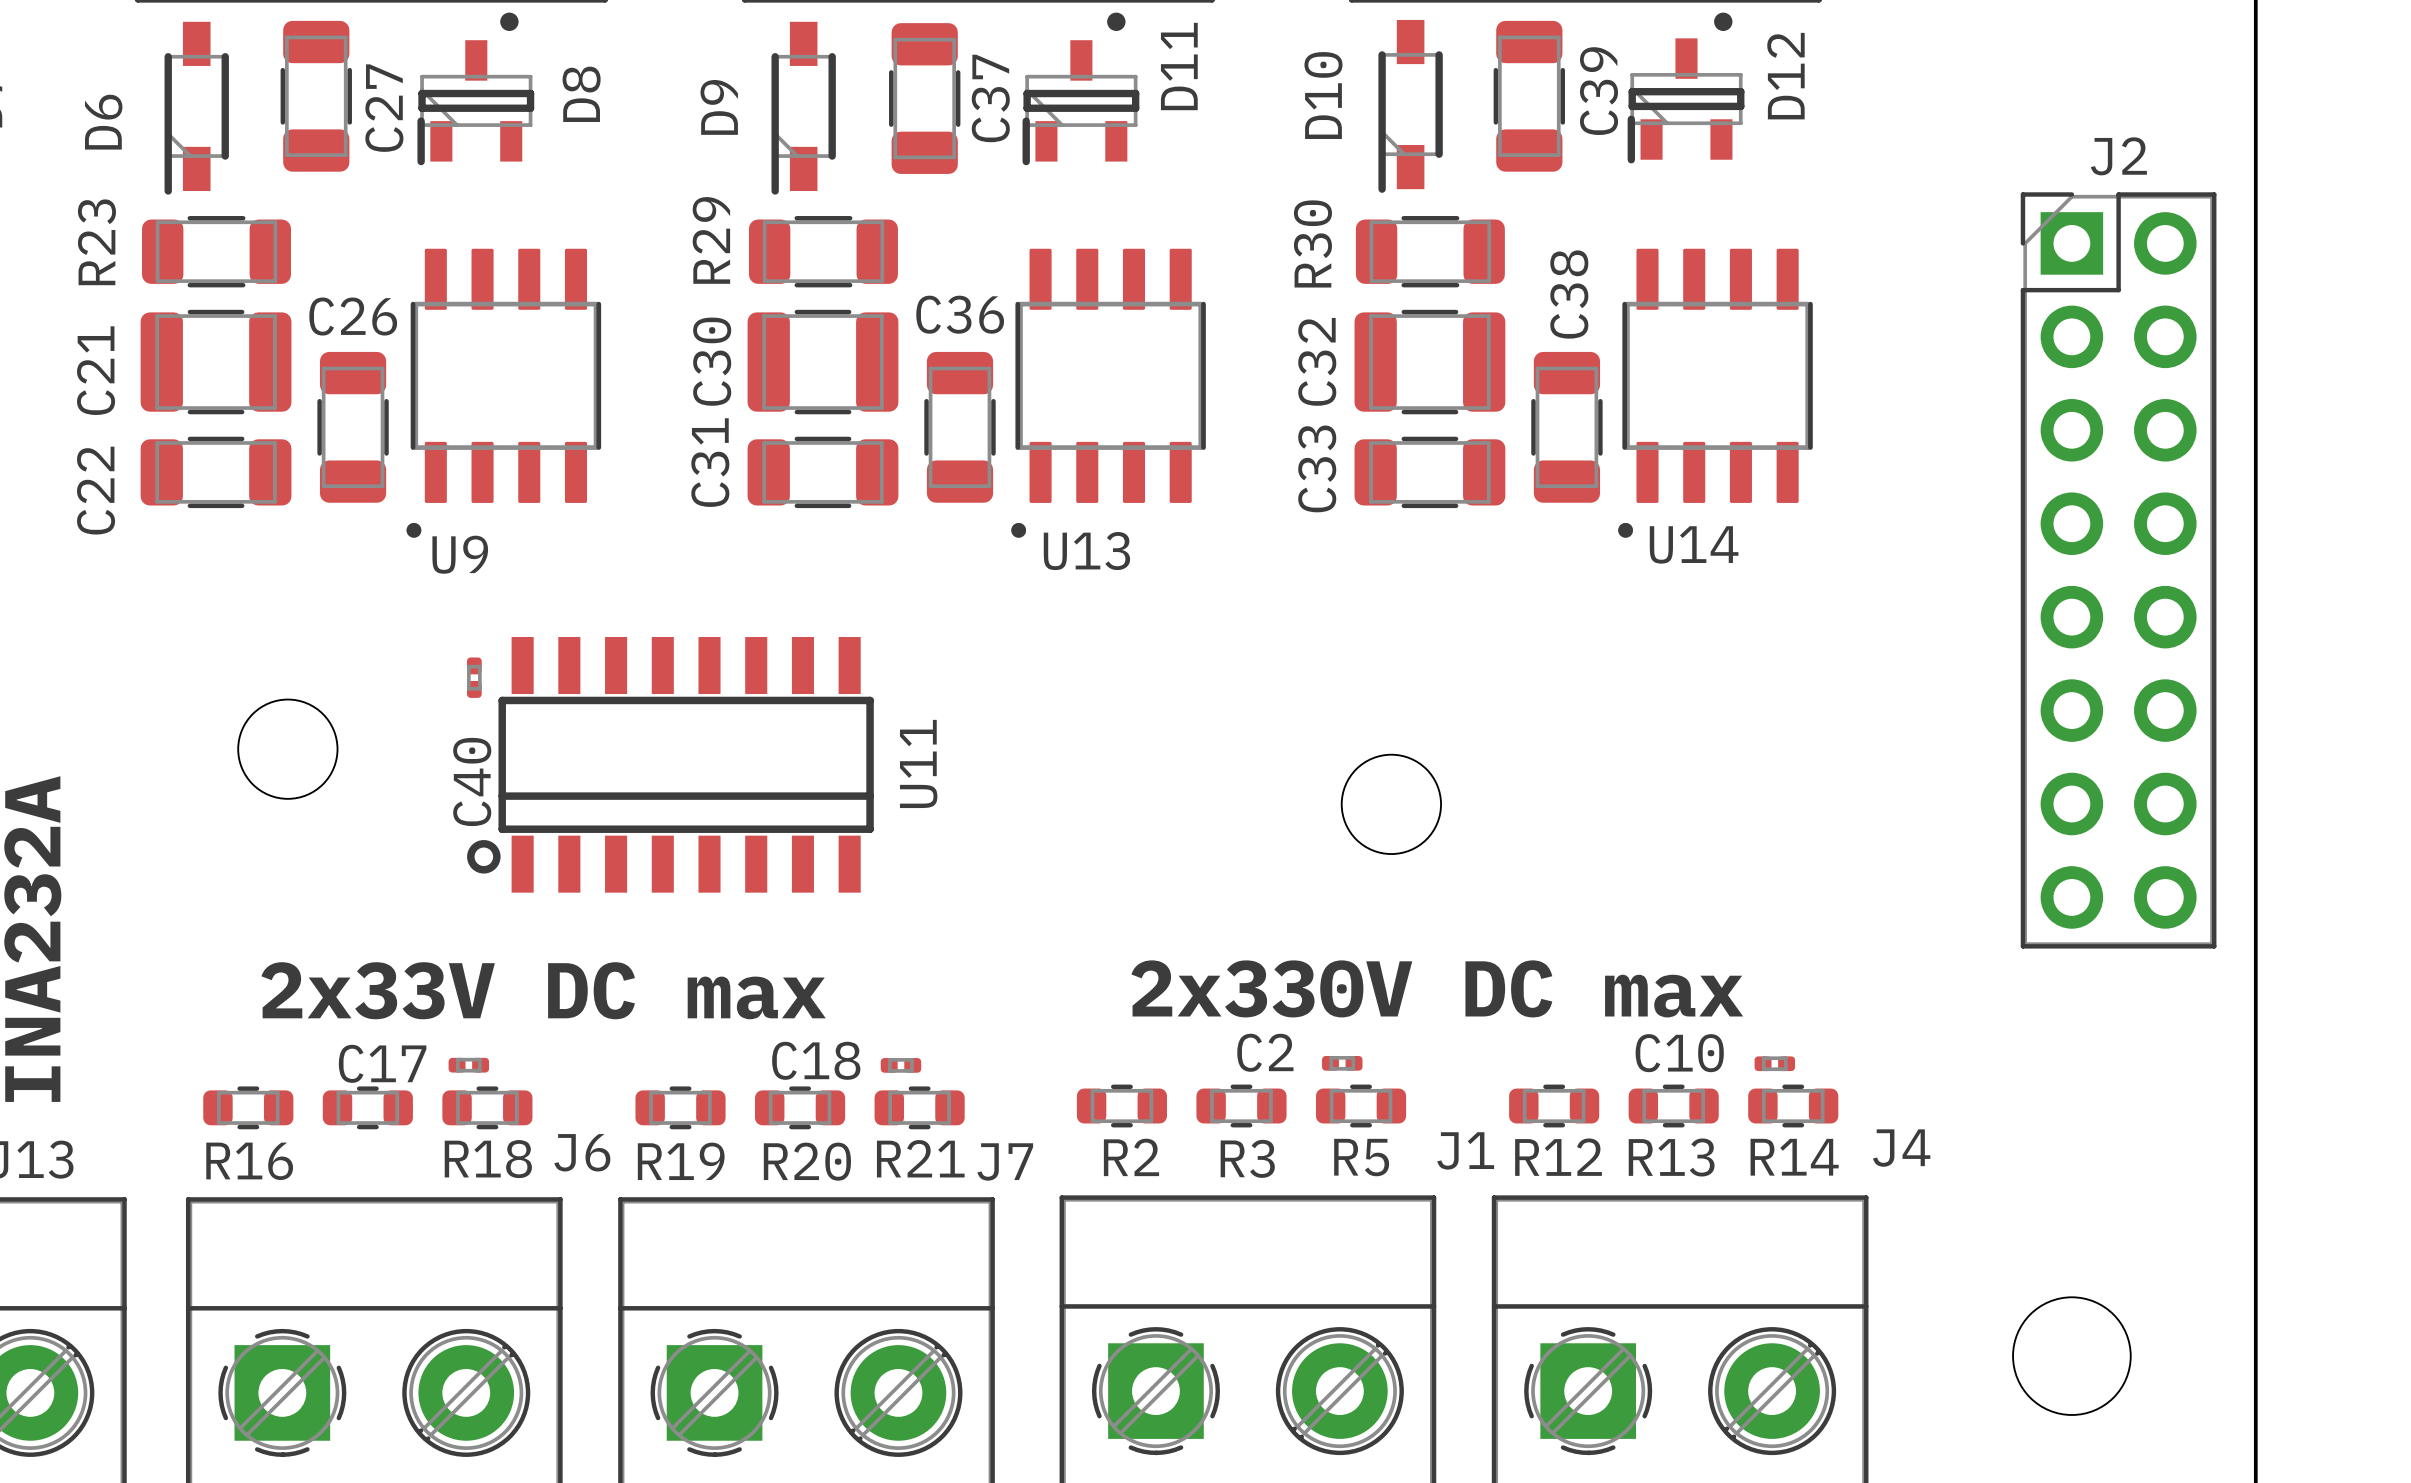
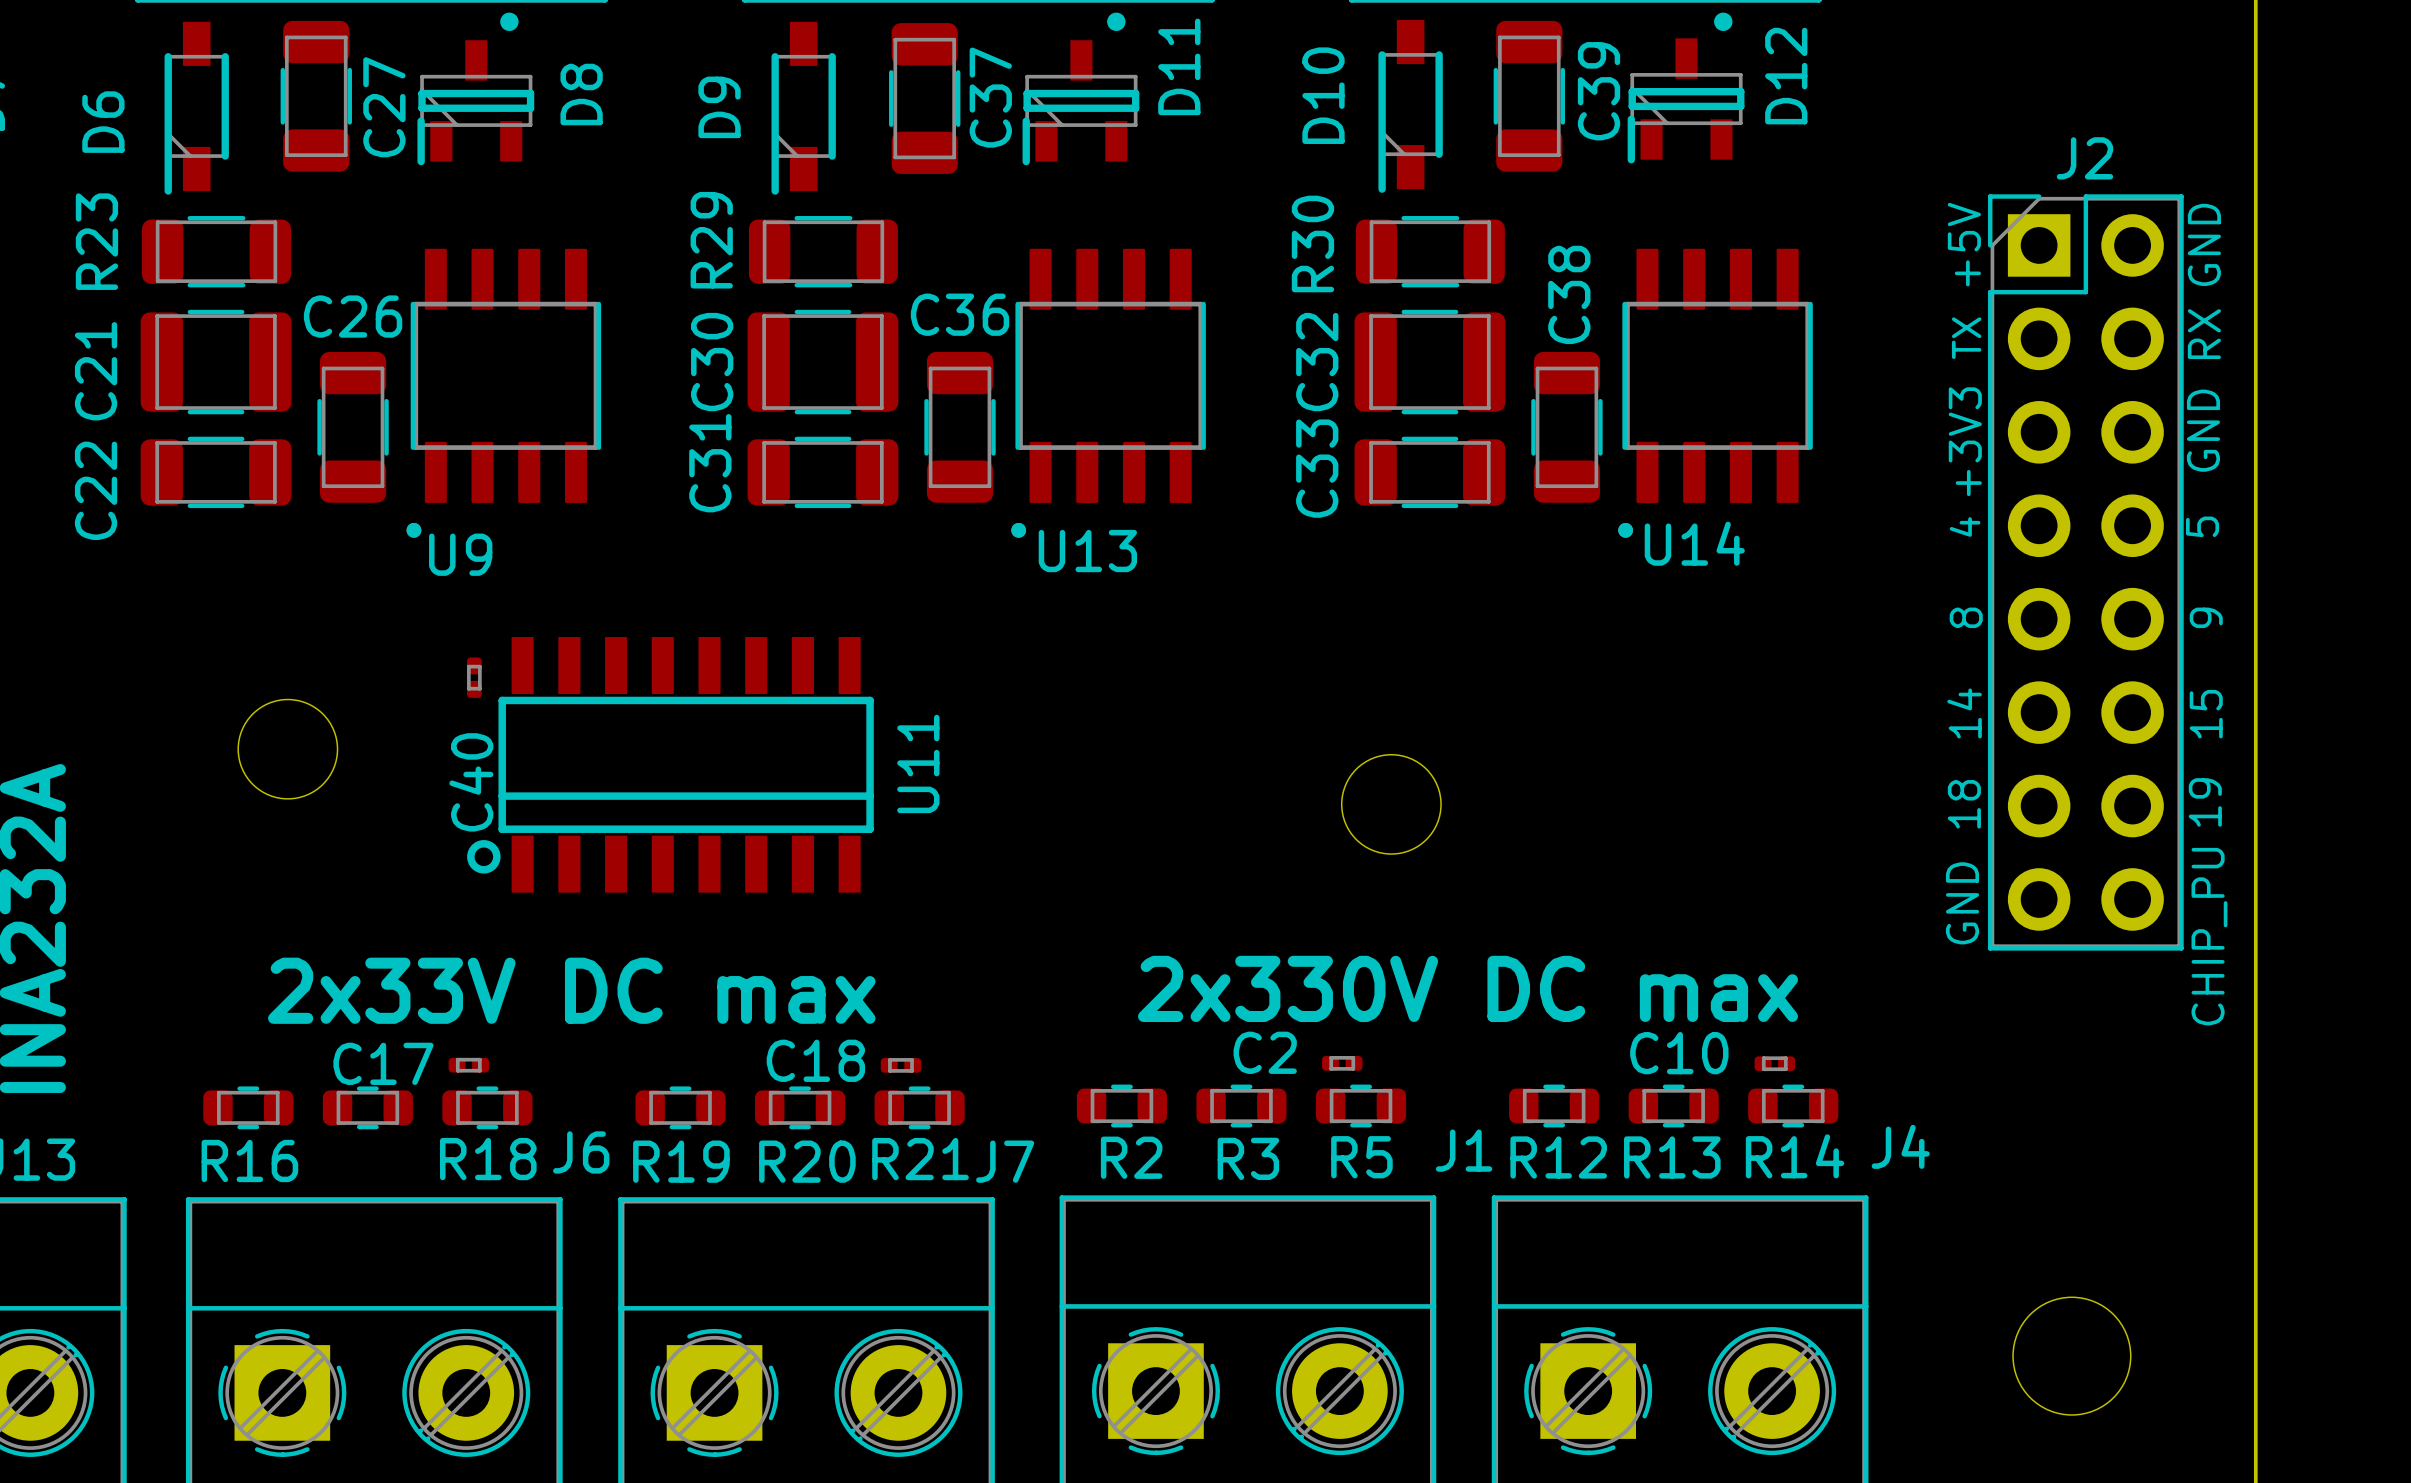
text: none -> GND (2204, 244)
text: none -> +5V (1964, 244)
text: none -> TX (1966, 338)
text: none -> RX (2204, 334)
text: none -> GND (2203, 430)
text: none -> +3V3 (1965, 441)
text: none -> 5 (2202, 526)
text: none -> 4 (1965, 526)
J2 position: (2118, 570) -> (2085, 572)
text: none -> 8 (1966, 617)
text: none -> 9 (2206, 617)
text: none -> 14 (1964, 713)
text: none -> 15 (2206, 714)
text: none -> 19 (2205, 802)
text: none -> 18 (1964, 804)
text: none -> GND (1962, 903)
text: none -> CHIP_PU (2209, 936)

